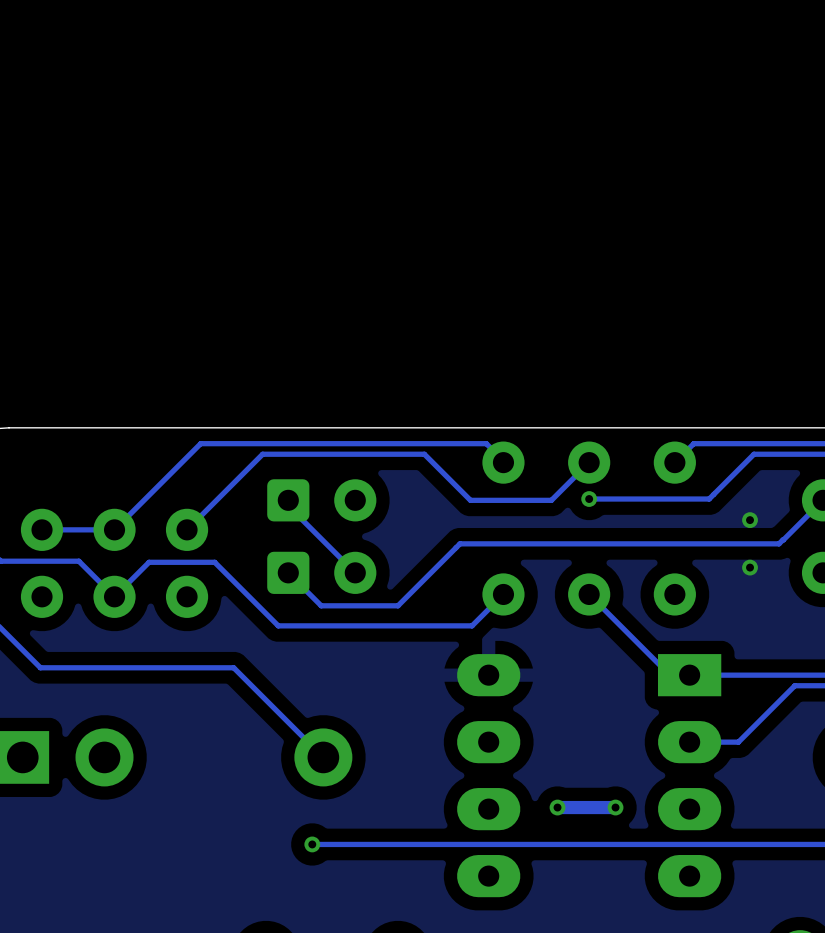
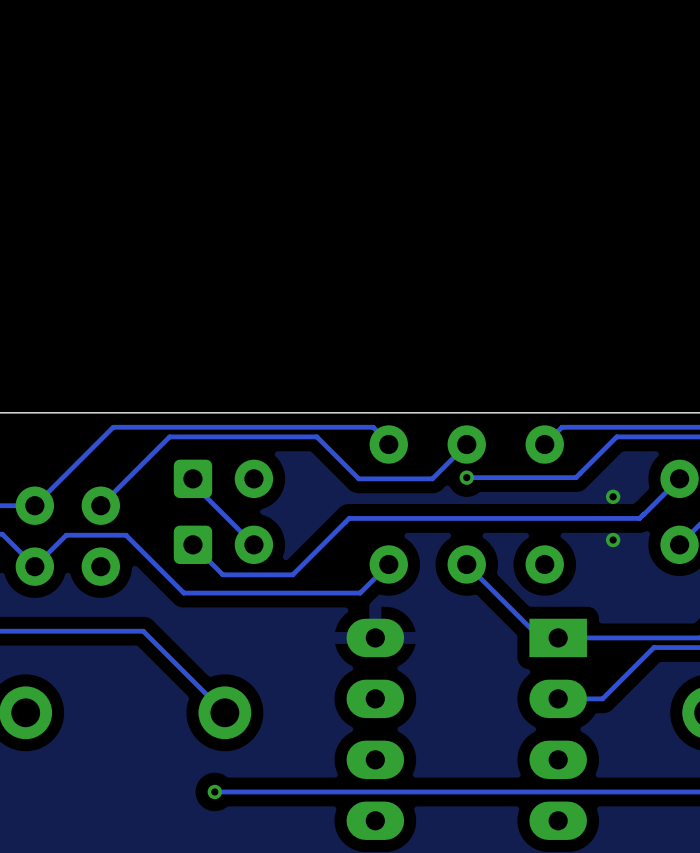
via: (557, 807) -> none
track: (615, 807) (557, 807) -> none
via: (615, 807) -> none

